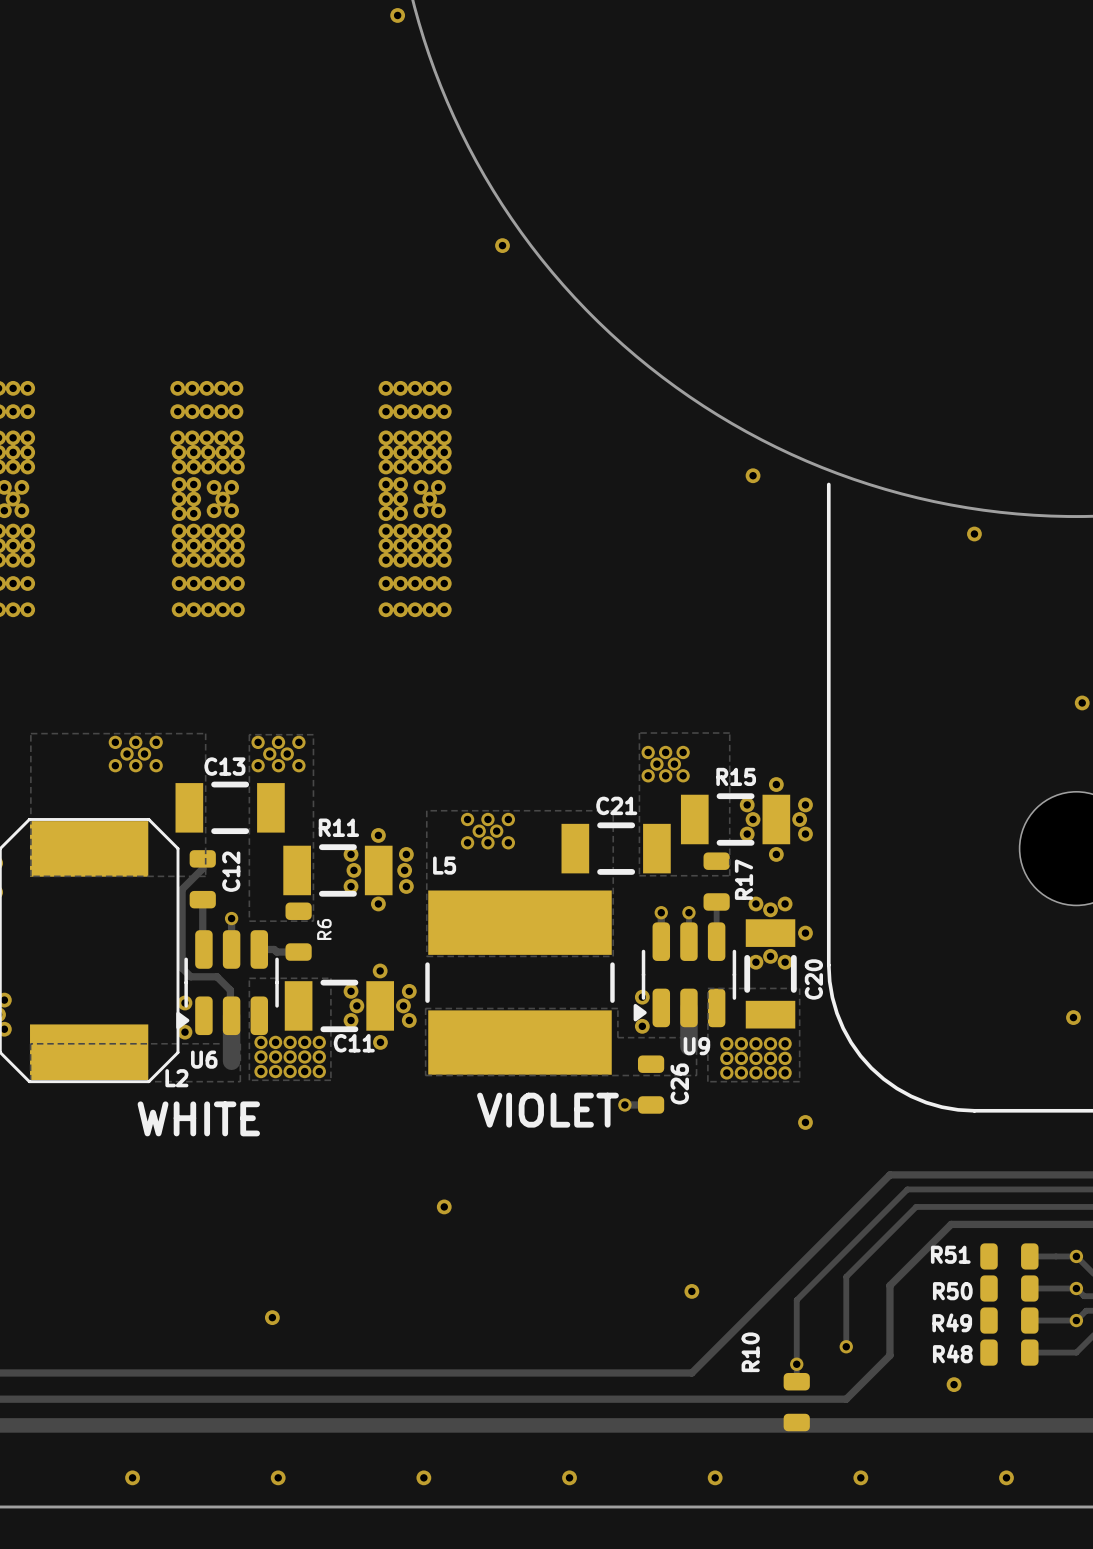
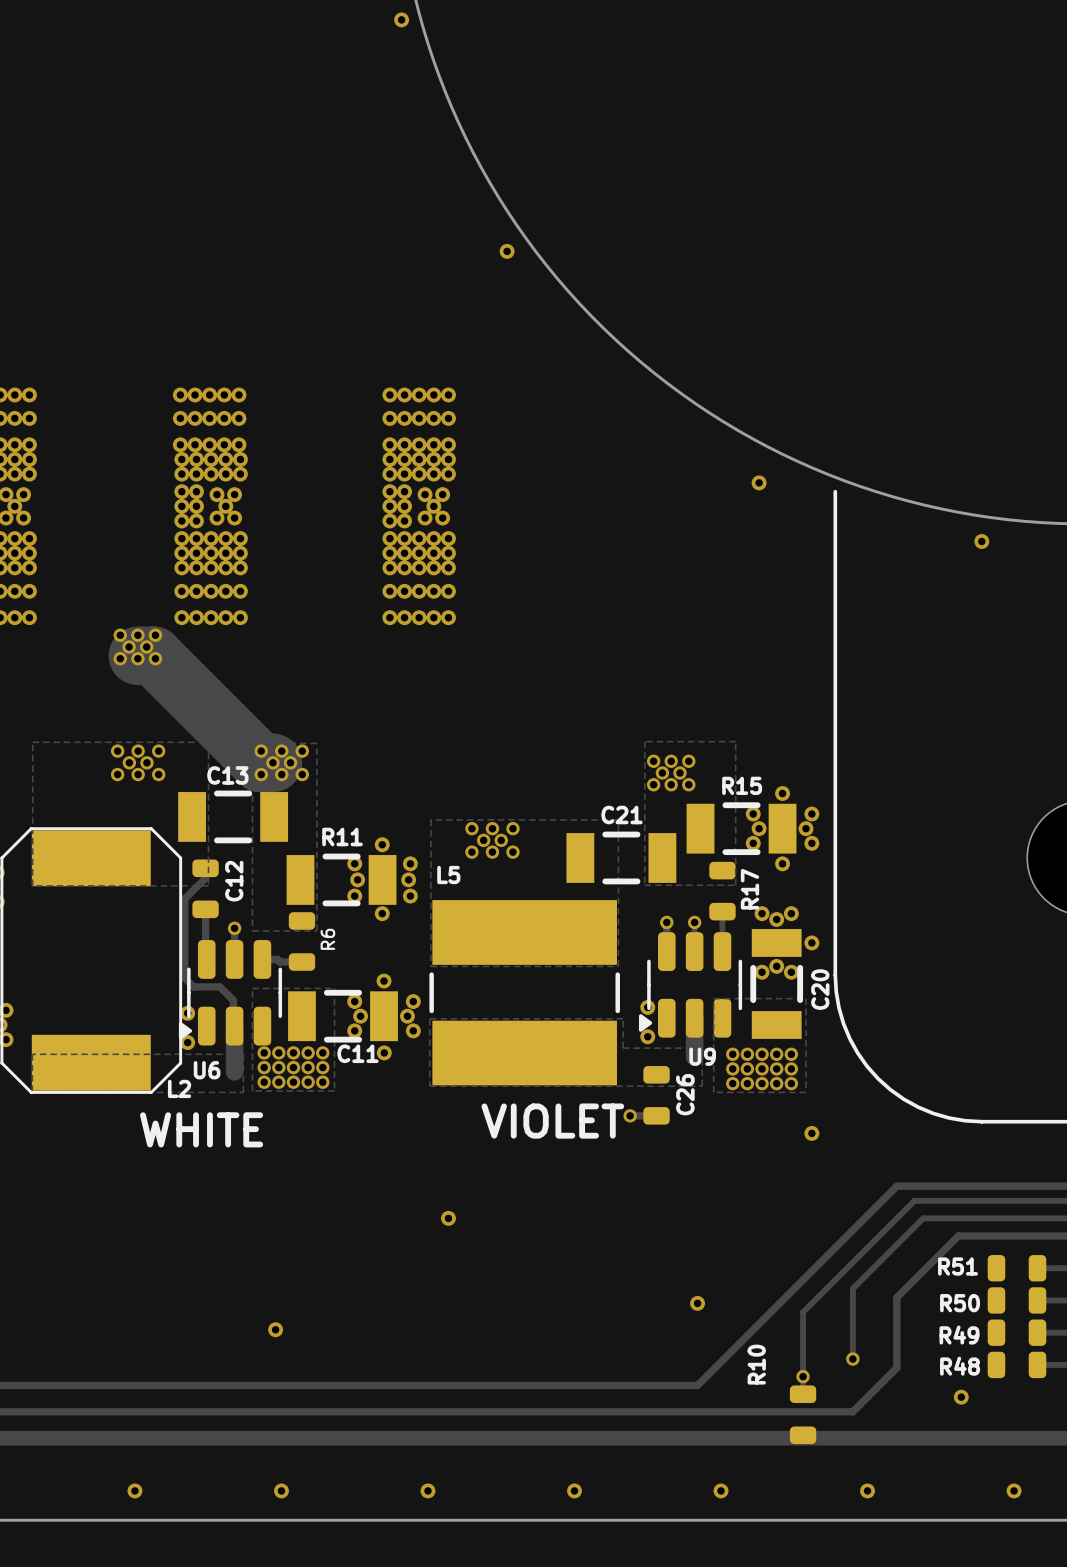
via: none -> (120, 635)
via: none -> (137, 635)
via: none -> (155, 635)
via: none -> (129, 646)
track: none -> (137, 646) (137, 655) (153, 655) (260, 762) (272, 762)
via: none -> (146, 646)
via: none -> (120, 658)
via: none -> (137, 658)
via: none -> (155, 658)

